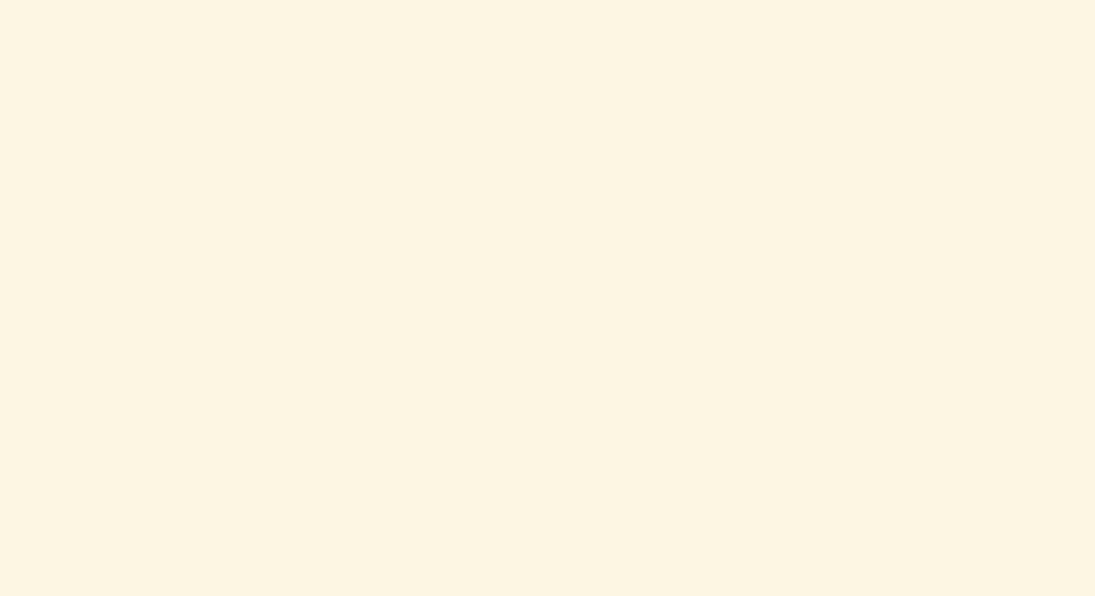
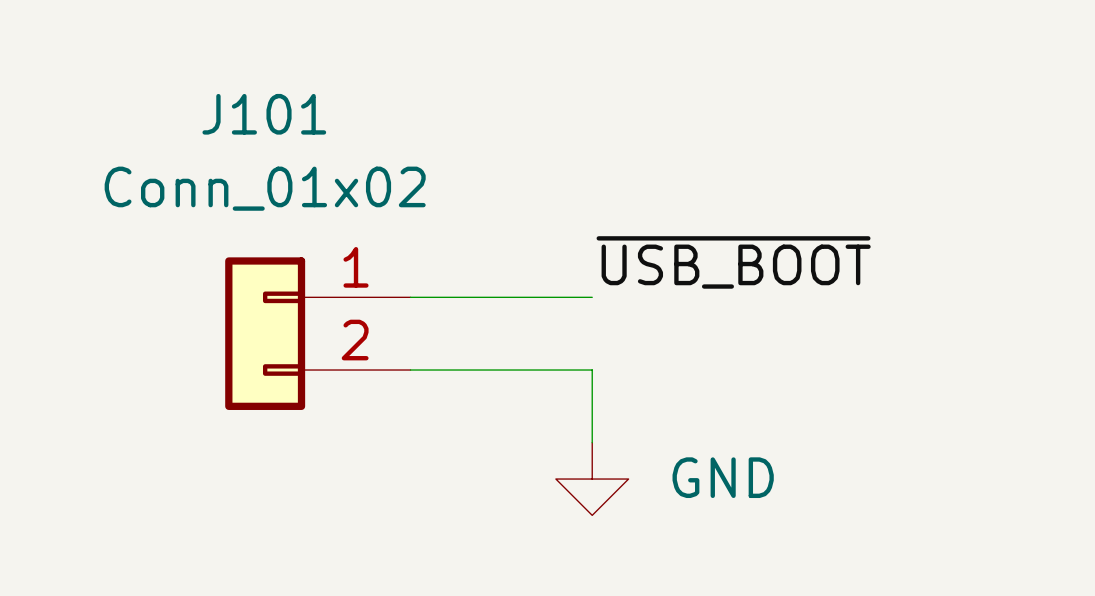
label: none -> ~{USB_BOOT} (733, 262)
wire: none -> (410, 297) (592, 297)
J101: none -> Conn_01x02 (317, 333)
wire: none -> (410, 370) (592, 370) (592, 442)
power symbol: none -> GND (592, 479)

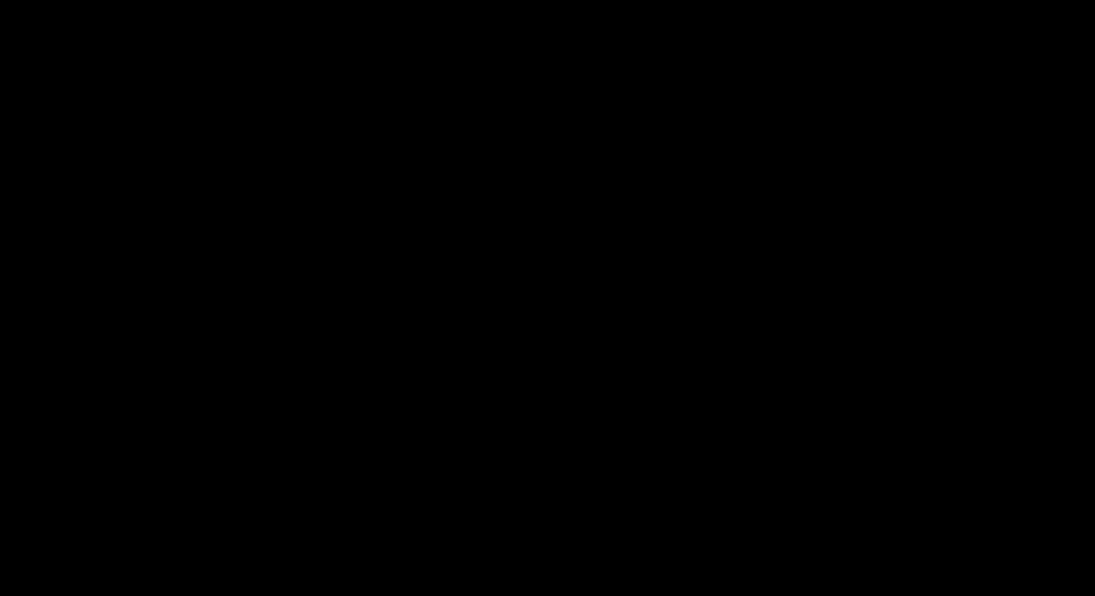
label: ~{USB_BOOT} (733, 262) -> none
wire: (410, 297) (592, 297) -> none
J101: Conn_01x02 (317, 333) -> none
wire: (410, 370) (592, 370) (592, 442) -> none
power symbol: GND (592, 479) -> none

